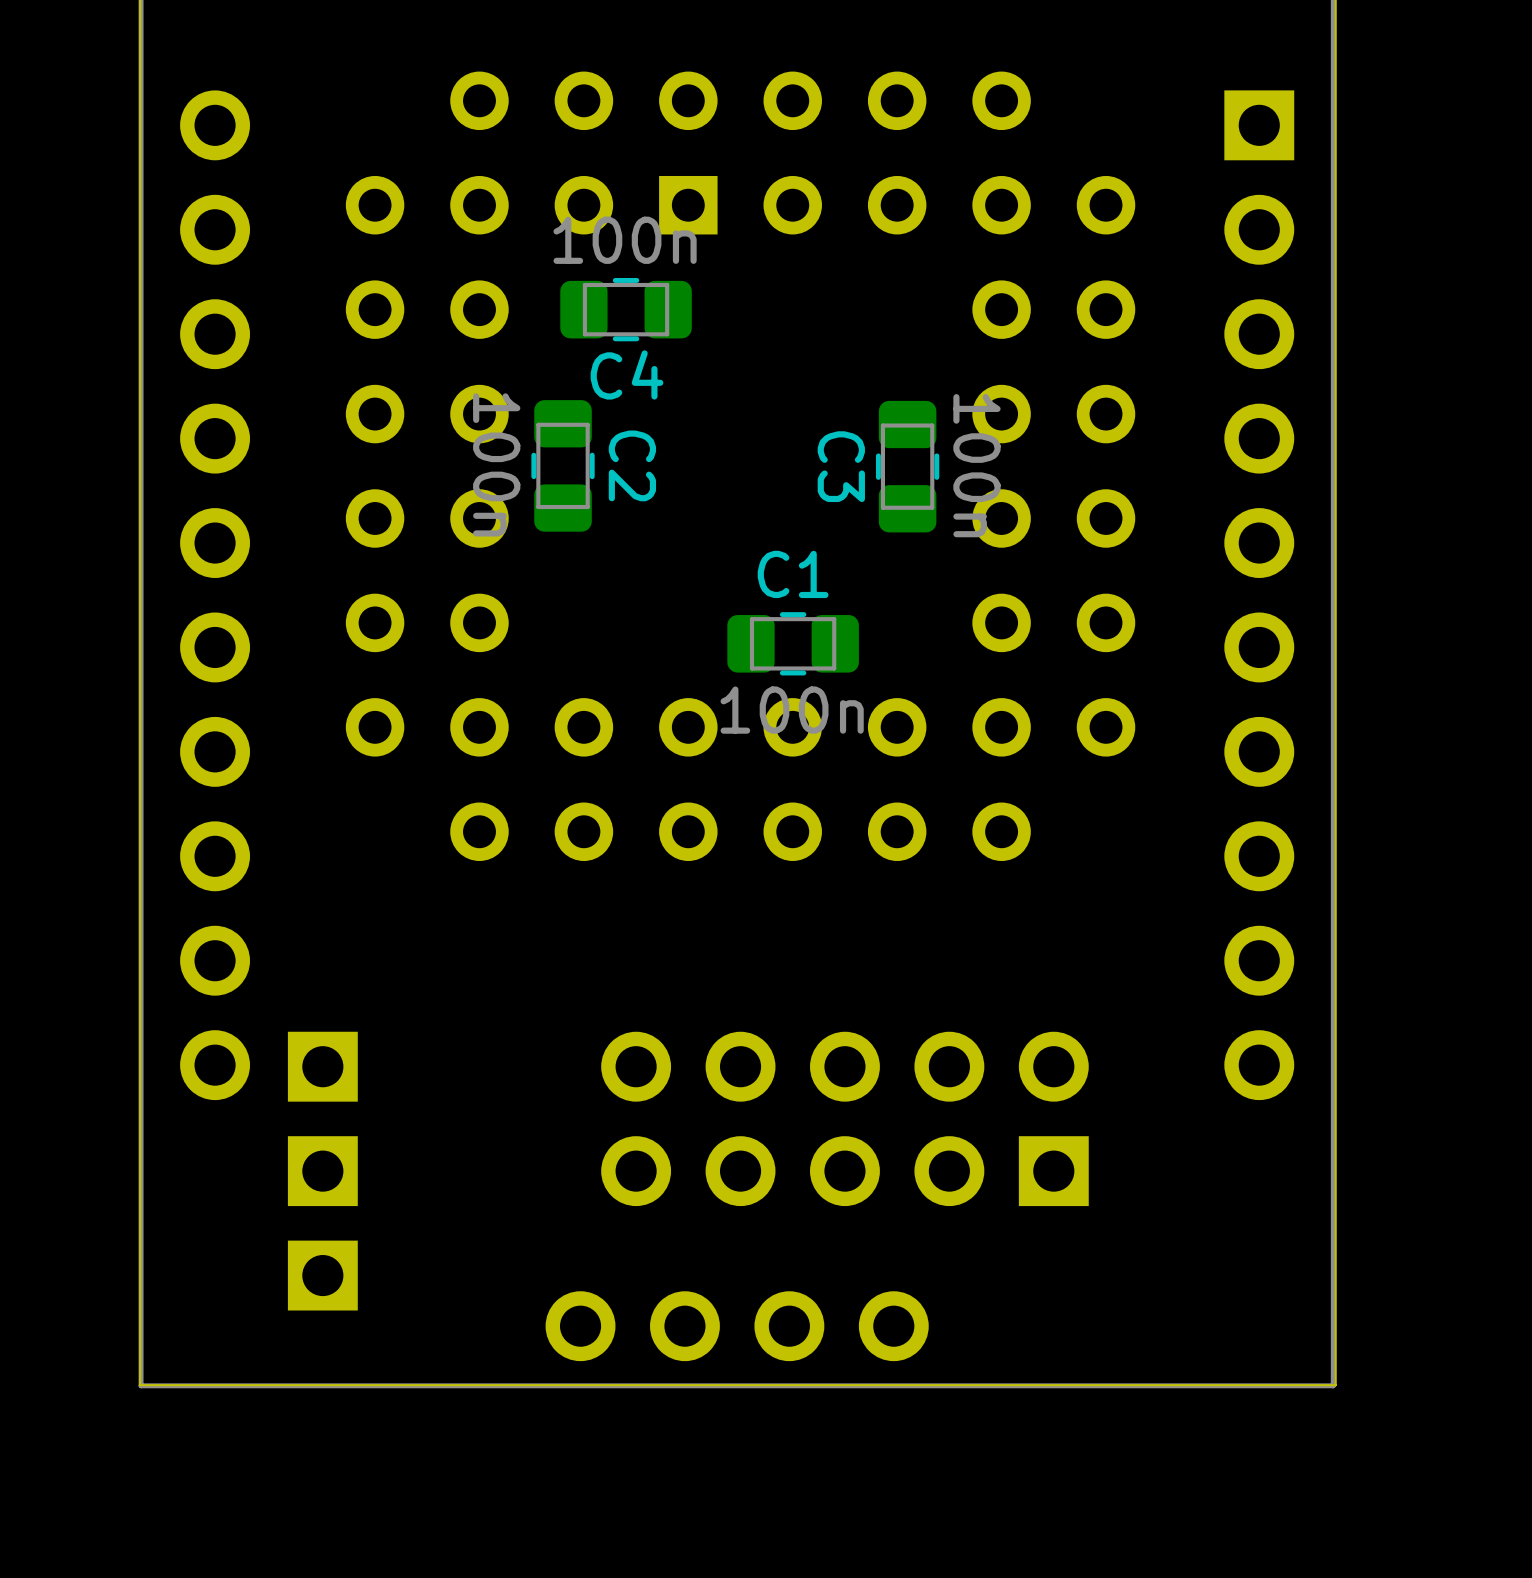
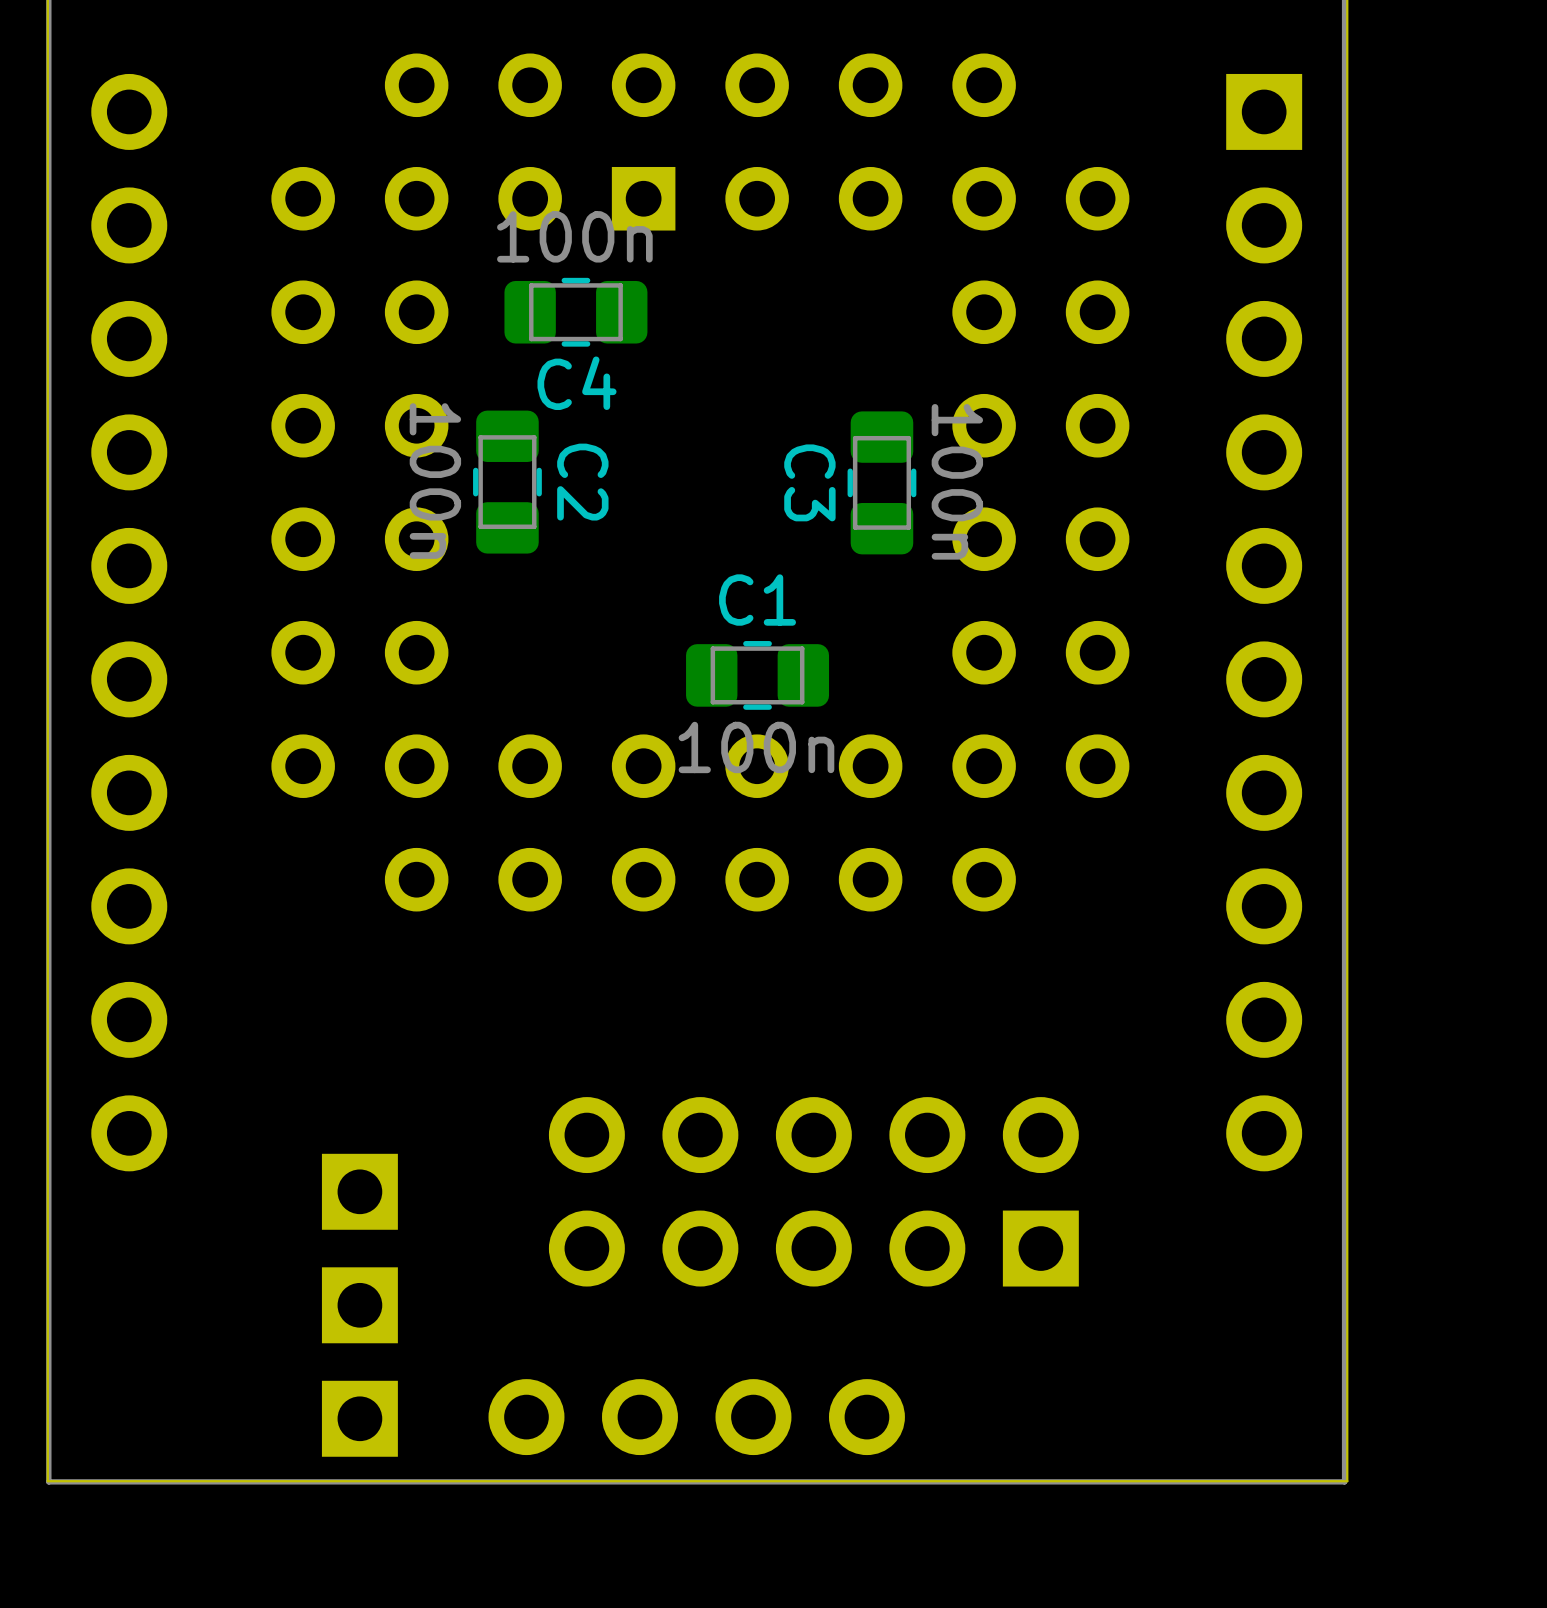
part position: (322, 1171) -> (359, 1305)

